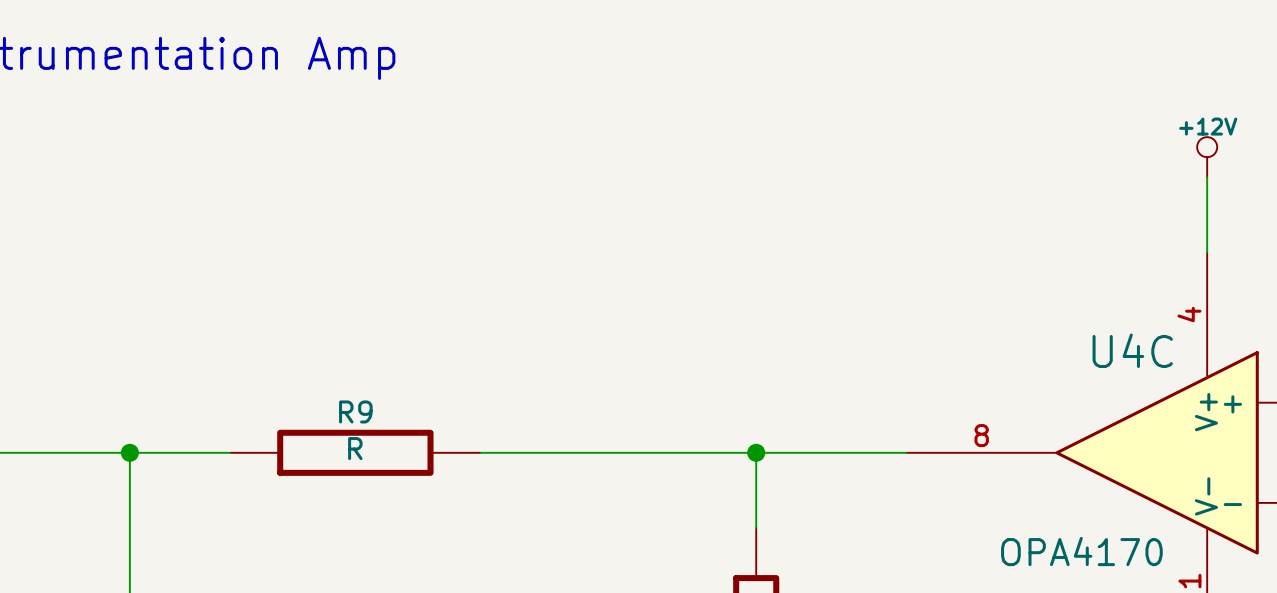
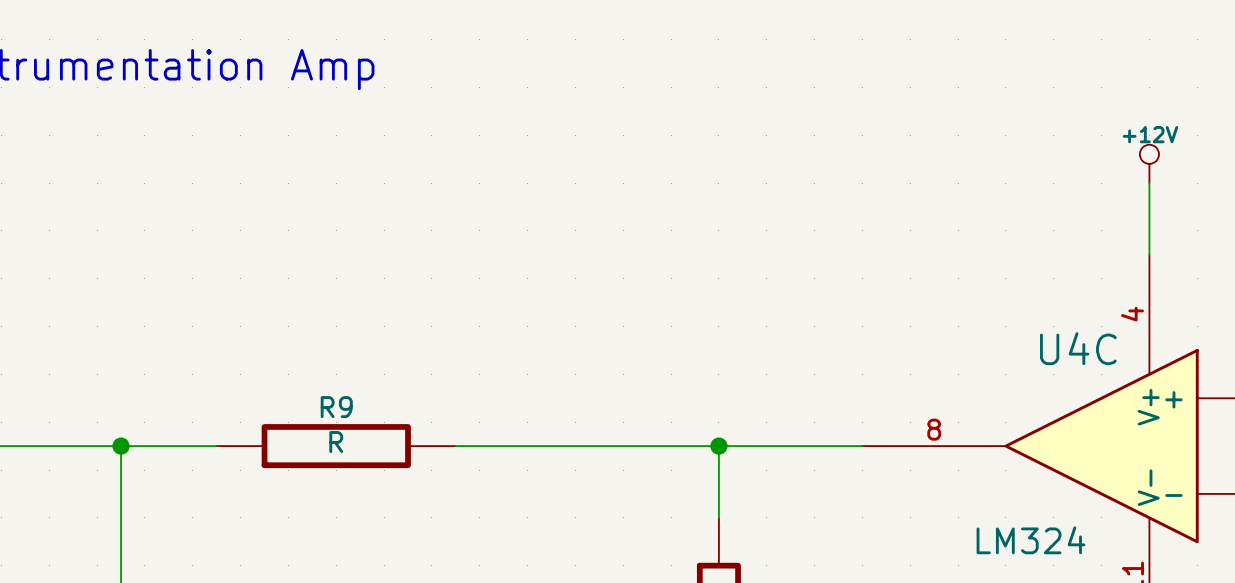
U4C value: OPA4170 (1081, 551) -> LM324 (1030, 540)

